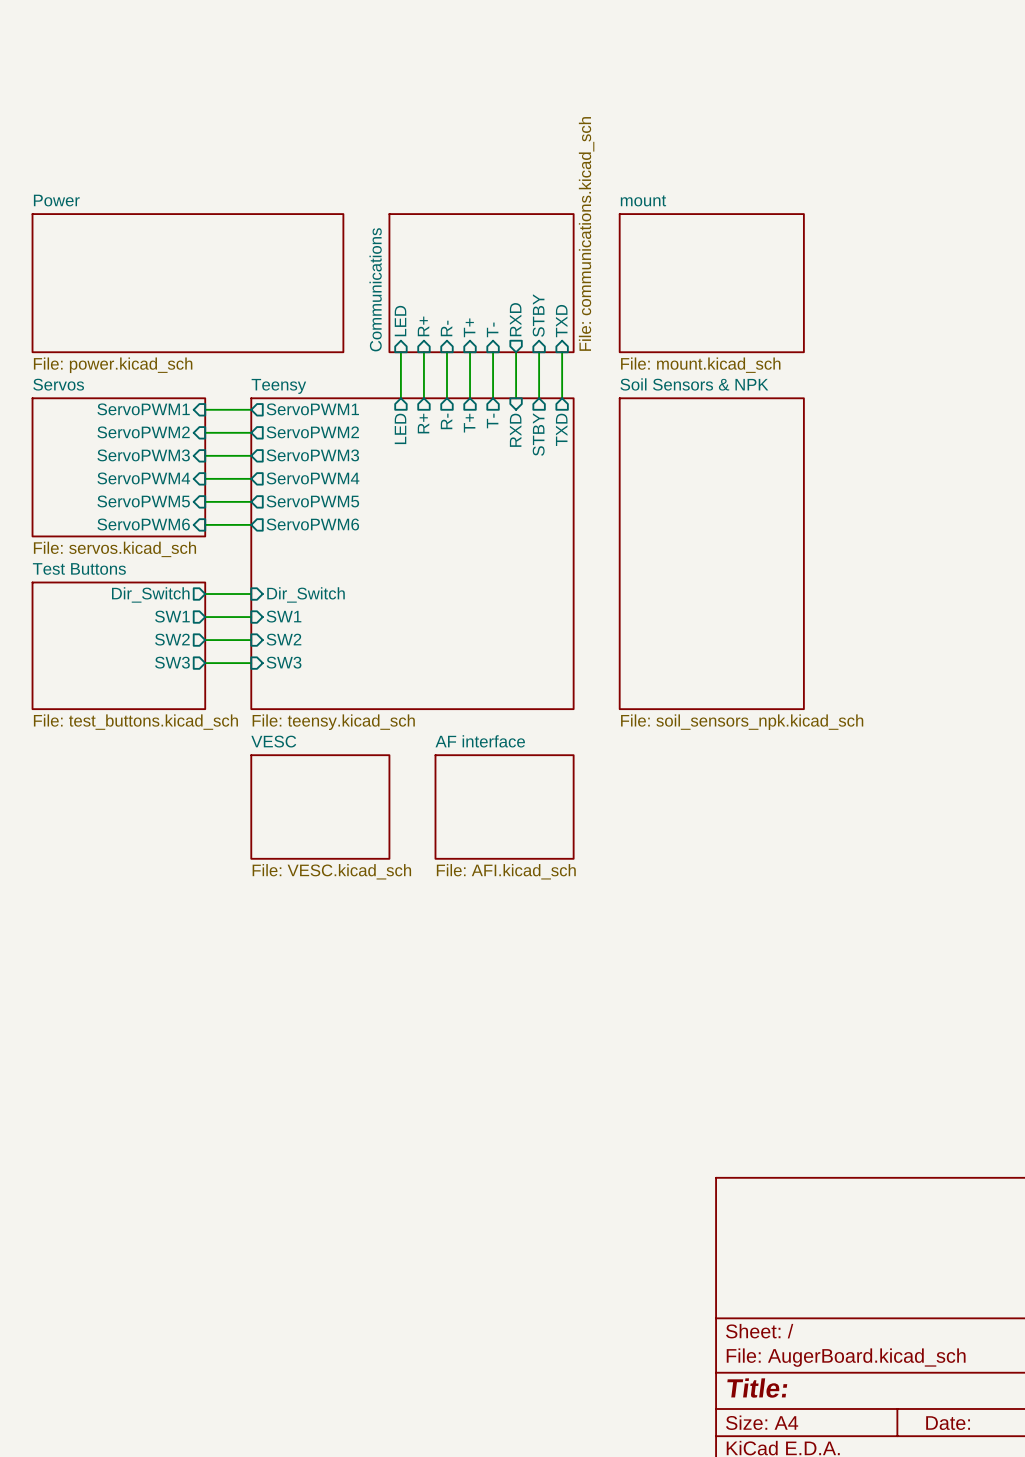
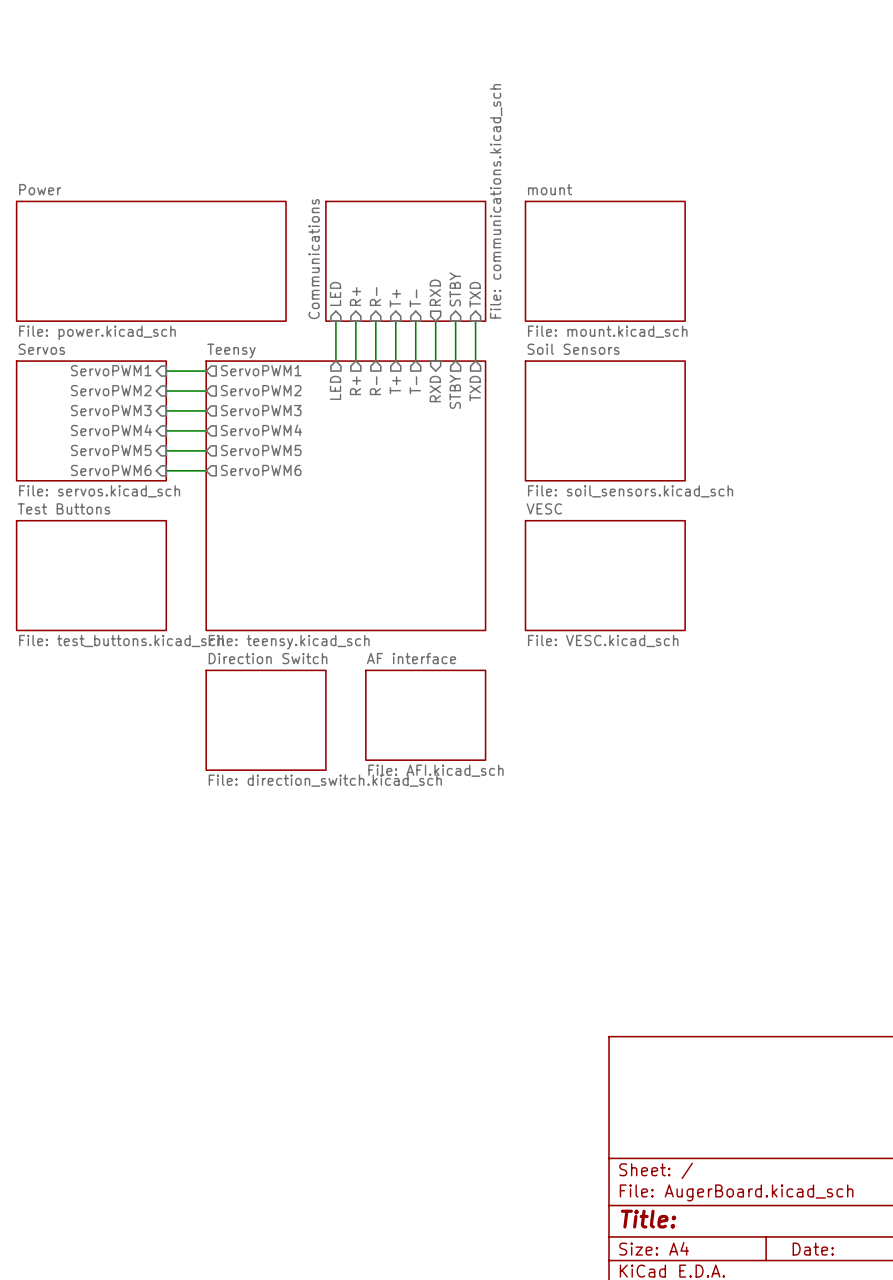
sheet Soil Sensors: none -> File: soil_sensors.kicad_sch (605, 420)
sheet Soil Sensors & NPK: File: soil_sensors_npk.kicad_sch (711, 553) -> none
sheet pin: Dir_Switch (150, 594) -> none
wire: (205, 594) (251, 594) -> none
sheet pin: Dir_Switch (306, 594) -> none
sheet pin: SW1 (172, 616) -> none
sheet pin: SW1 (283, 616) -> none
wire: (205, 617) (251, 617) -> none
sheet pin: SW2 (172, 639) -> none
sheet pin: SW2 (283, 639) -> none
wire: (205, 640) (251, 640) -> none
sheet VESC: none -> File: VESC.kicad_sch (605, 575)
sheet pin: SW3 (172, 662) -> none
sheet pin: SW3 (284, 662) -> none
wire: (205, 663) (251, 663) -> none
sheet VESC: File: VESC.kicad_sch (320, 807) -> none
sheet Direction Switch: none -> File: direction_switch.kicad_sch (266, 720)

